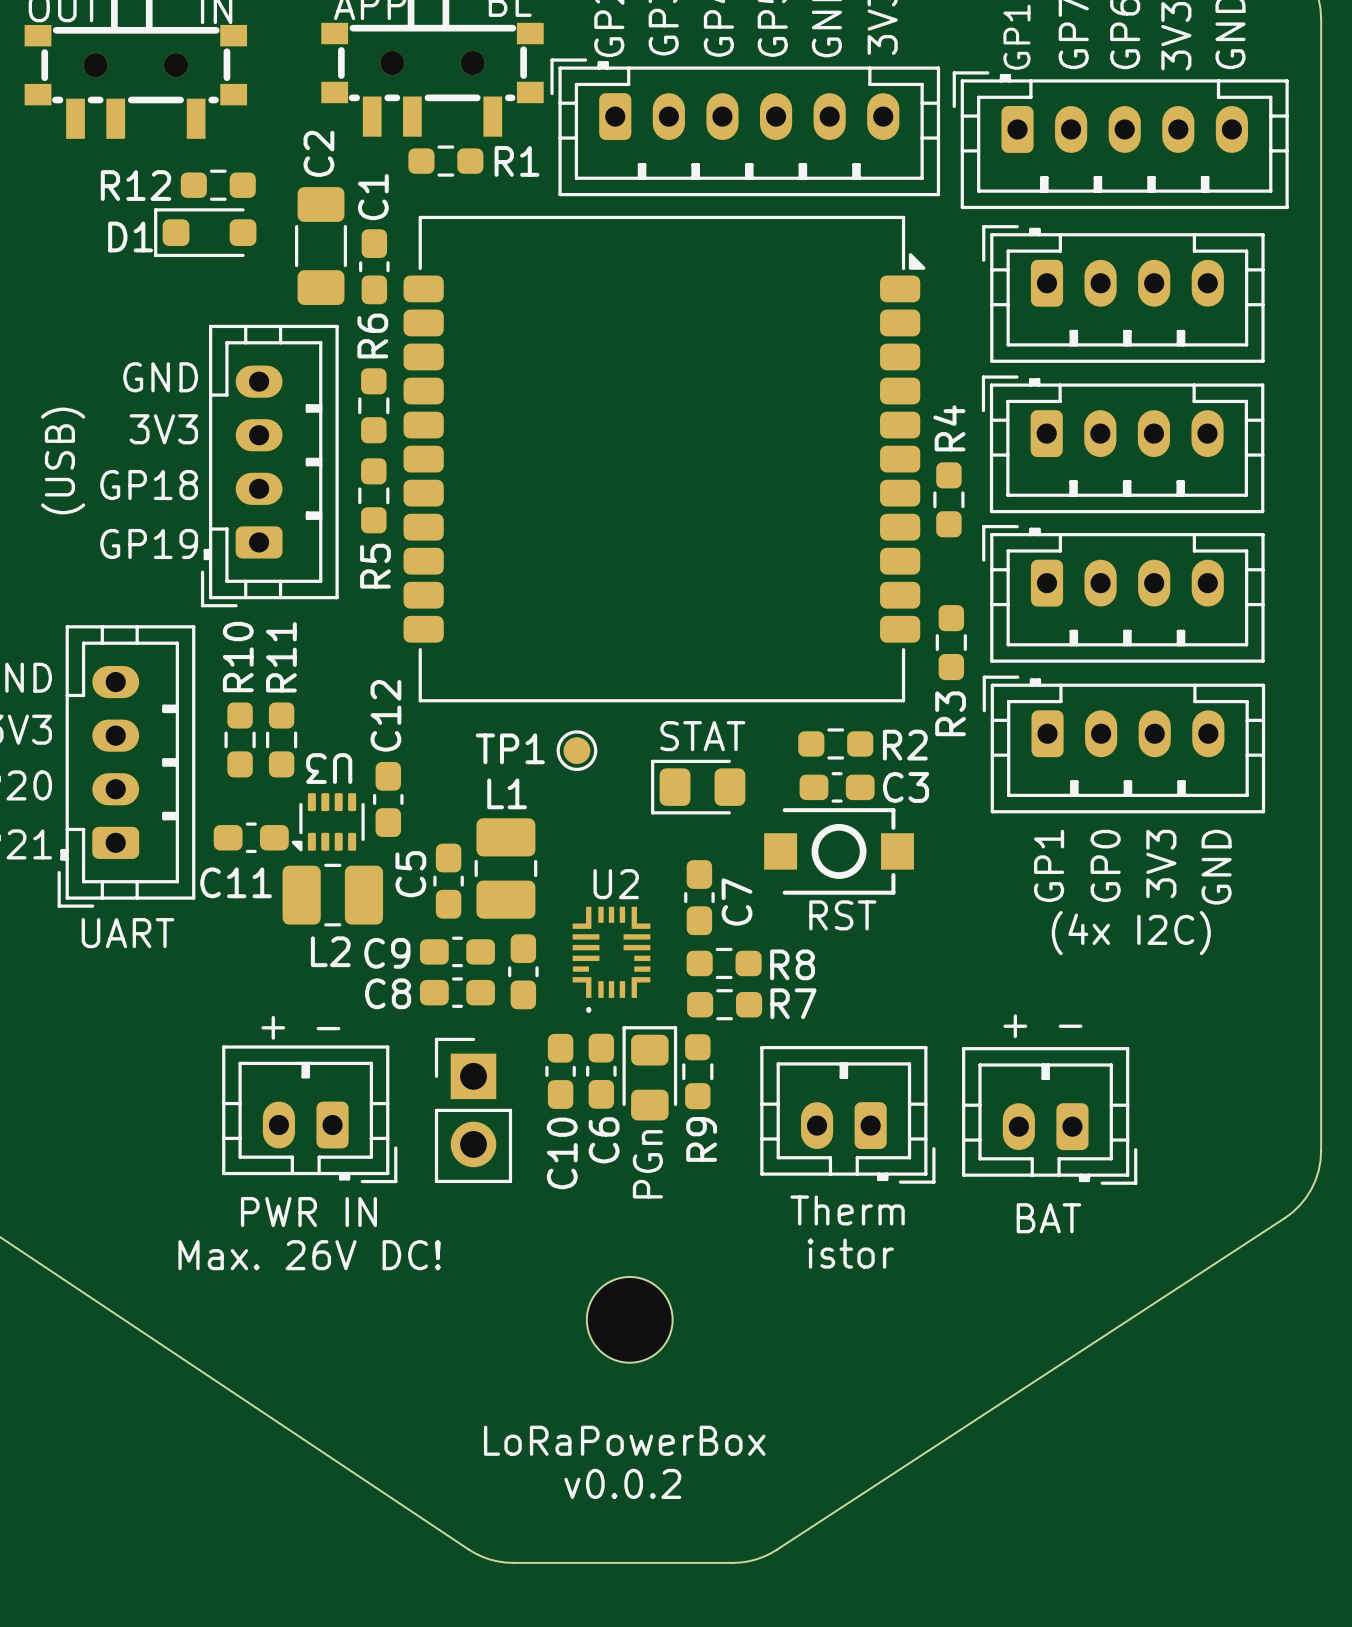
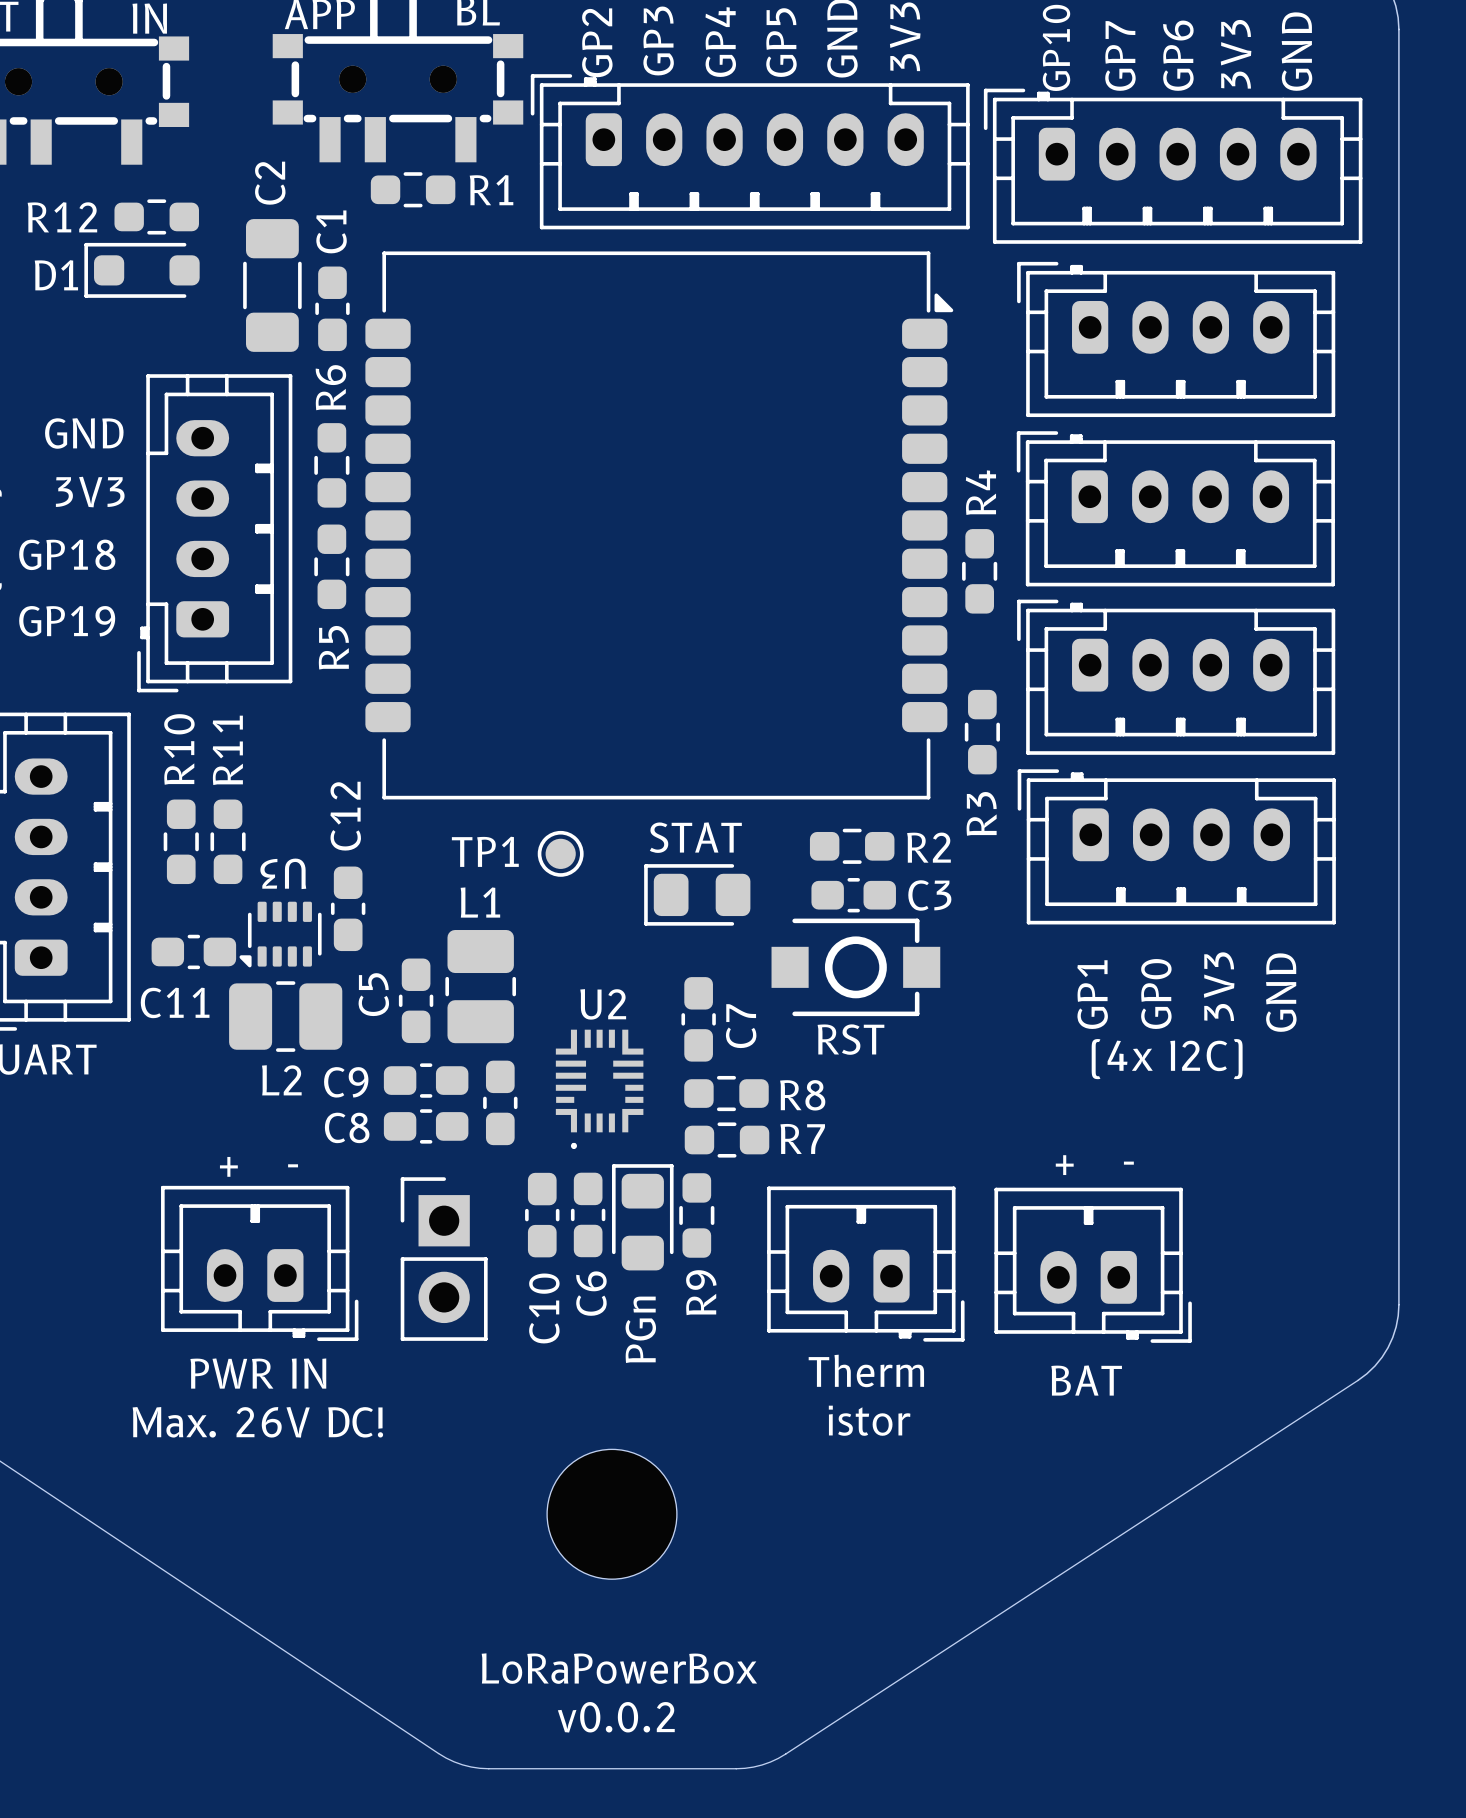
part footprint: [586, 1276, 673, 1363] -> [547, 1449, 677, 1580]
text: LoRaPowerBox (624, 1440) -> none
text: v0.0.2 (622, 1483) -> LoRaPowerBox (619, 1668)
text: none -> v0.0.2 (616, 1717)

